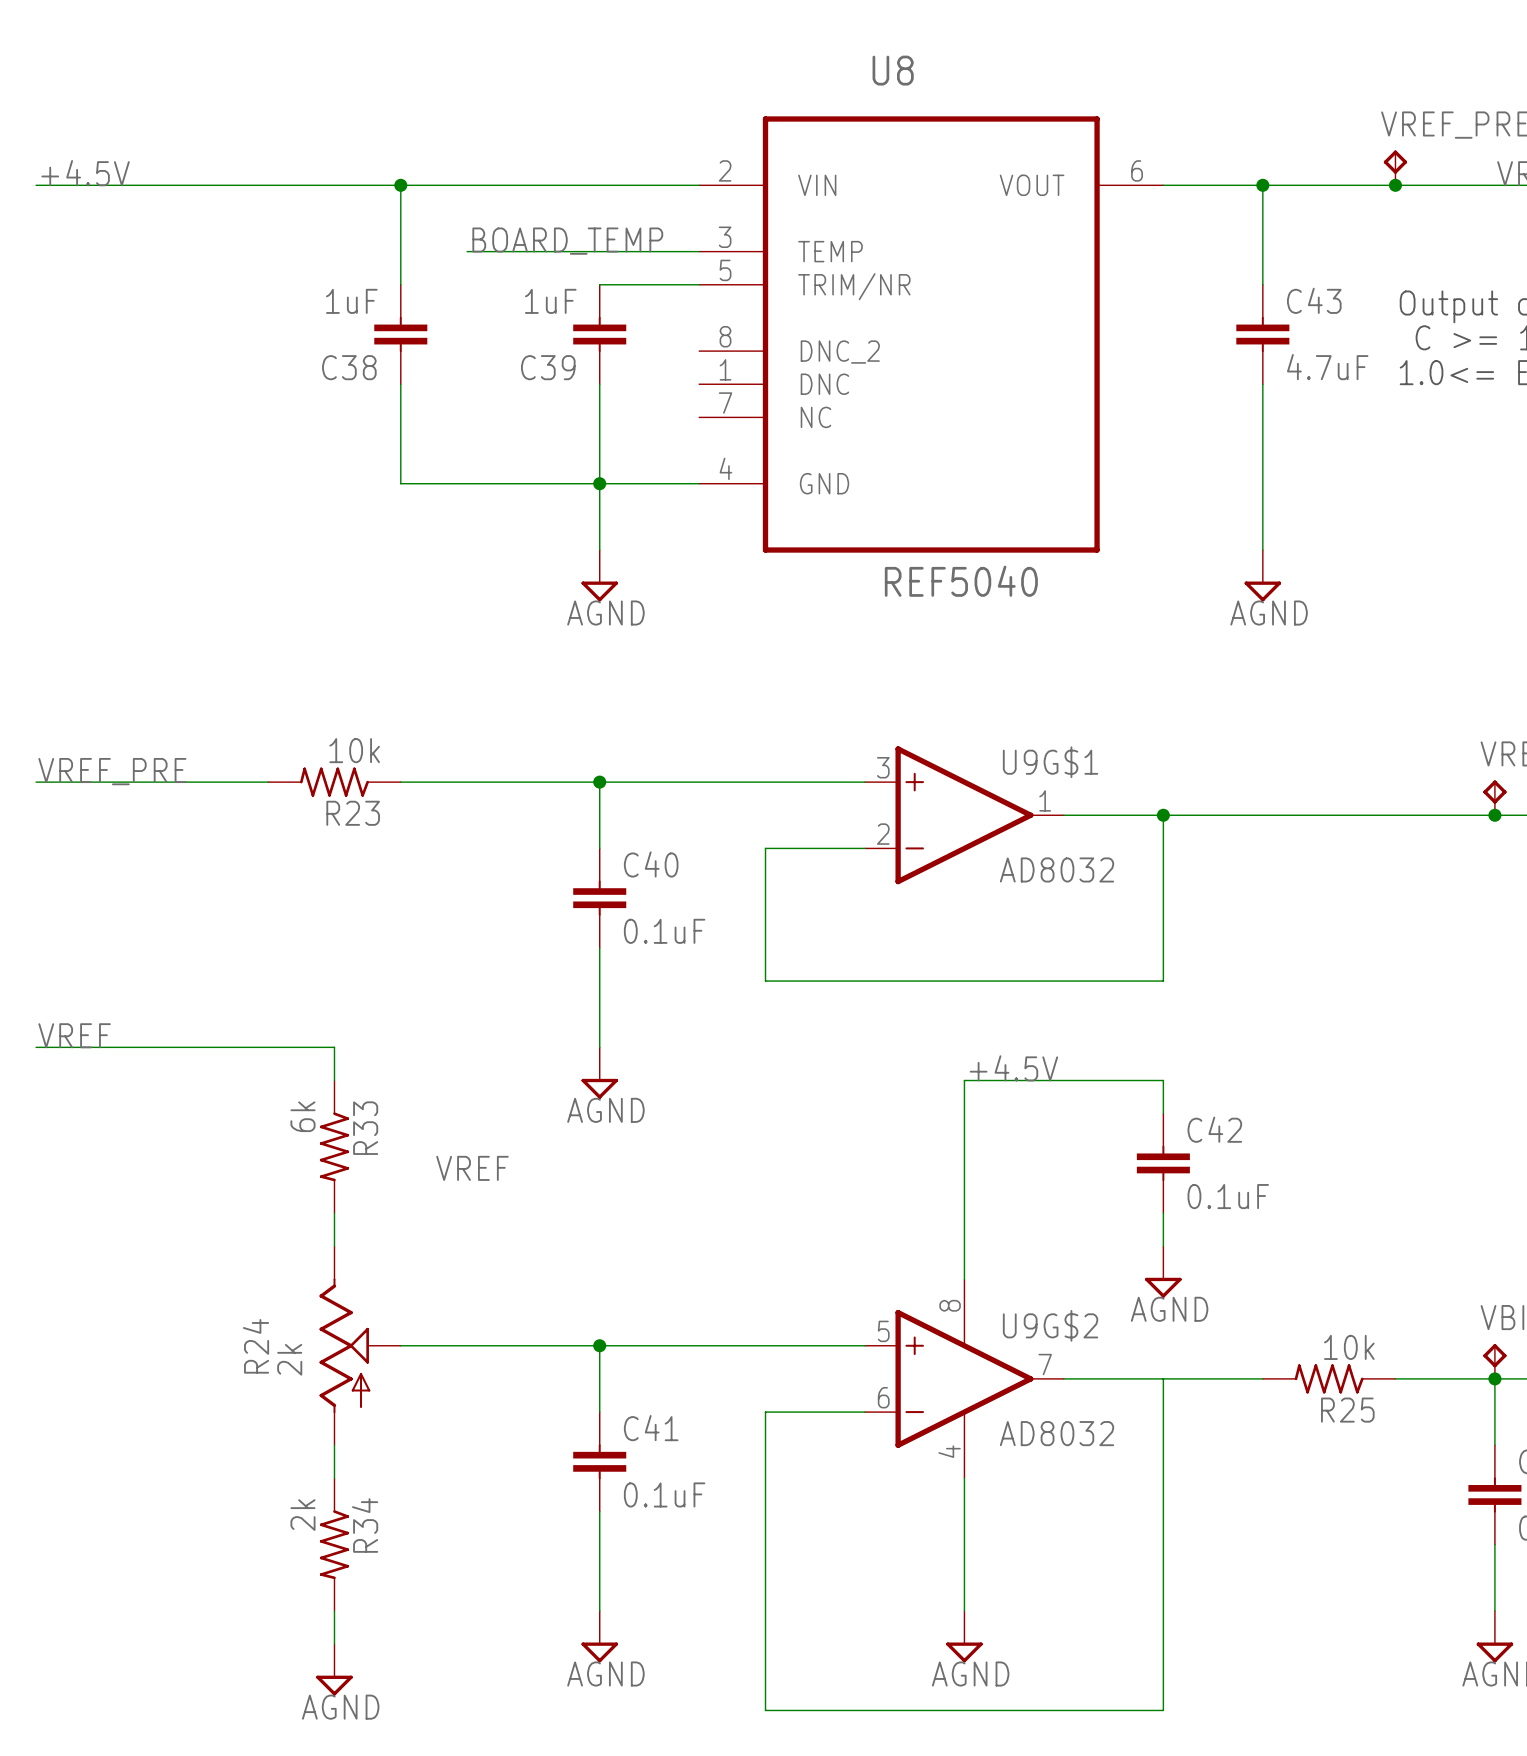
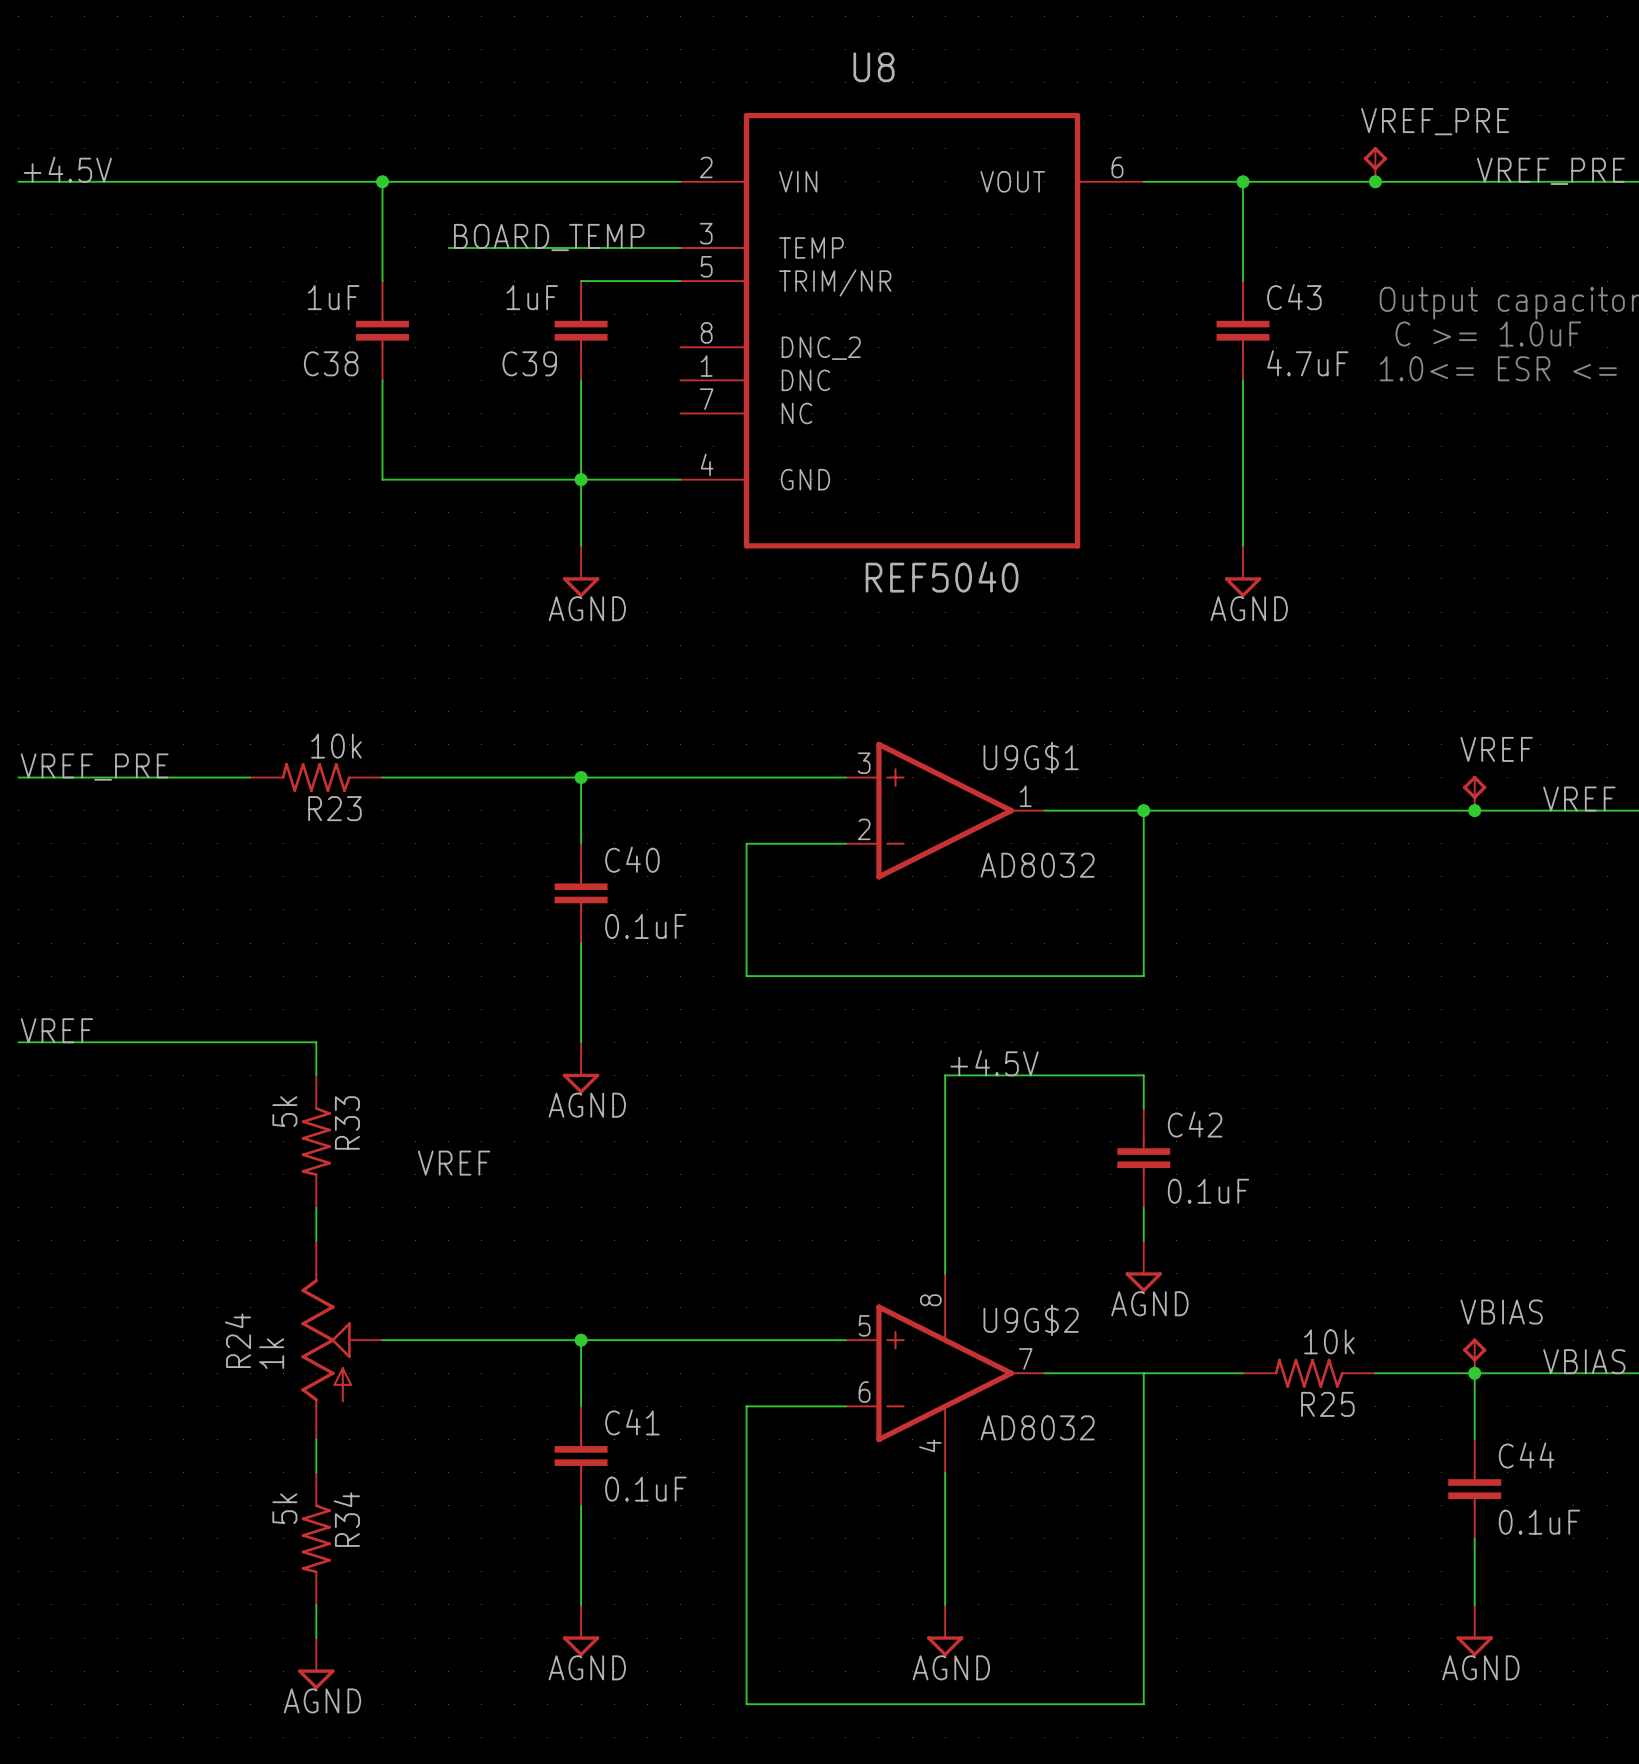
R33 value: 6k (302, 1116) -> 5k (284, 1111)
R24 value: 2k (289, 1359) -> 1k (271, 1353)
R34 value: 2k (302, 1515) -> 5k (284, 1508)

